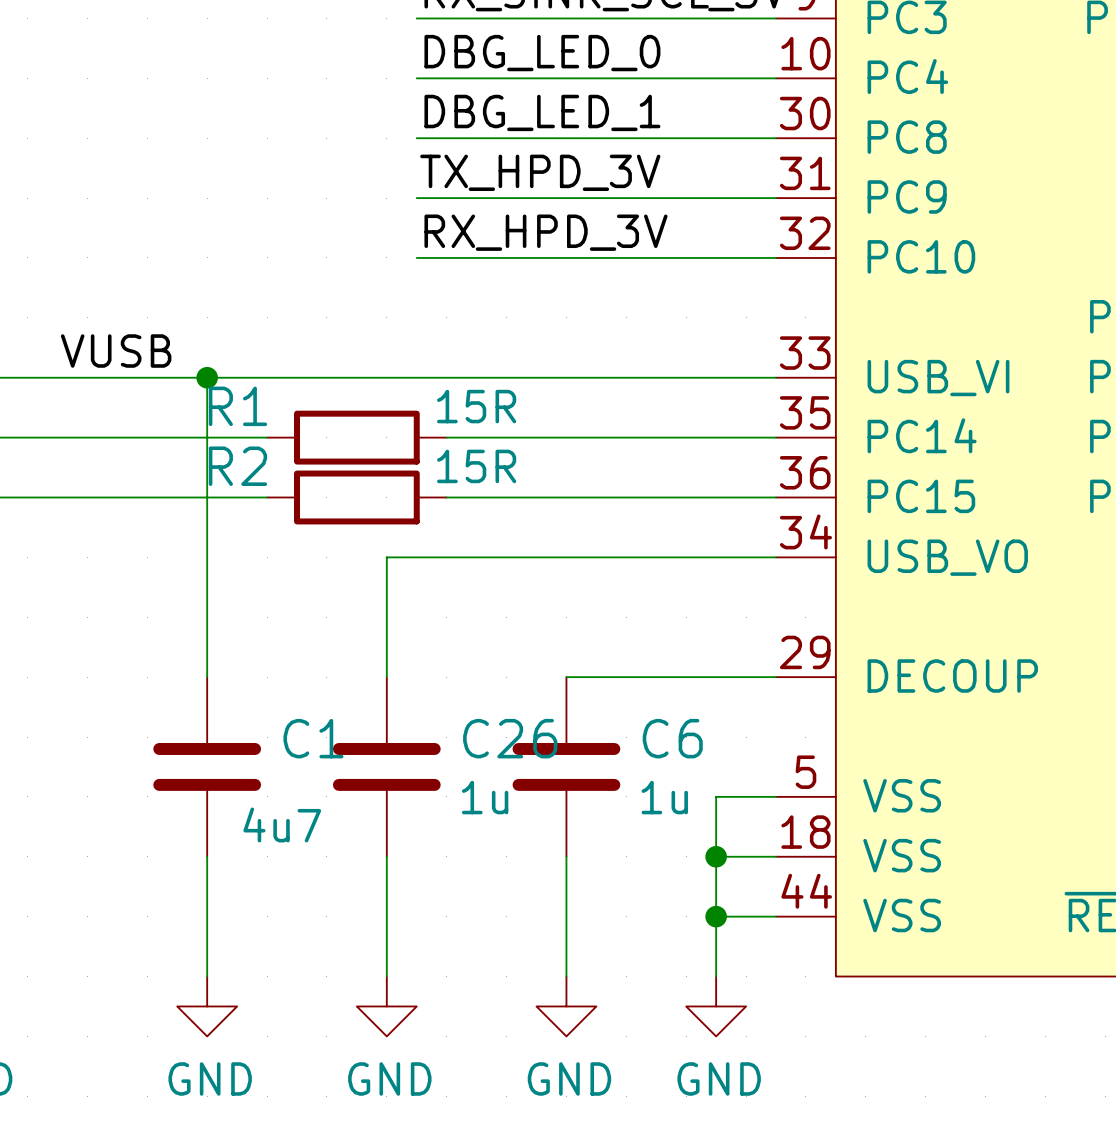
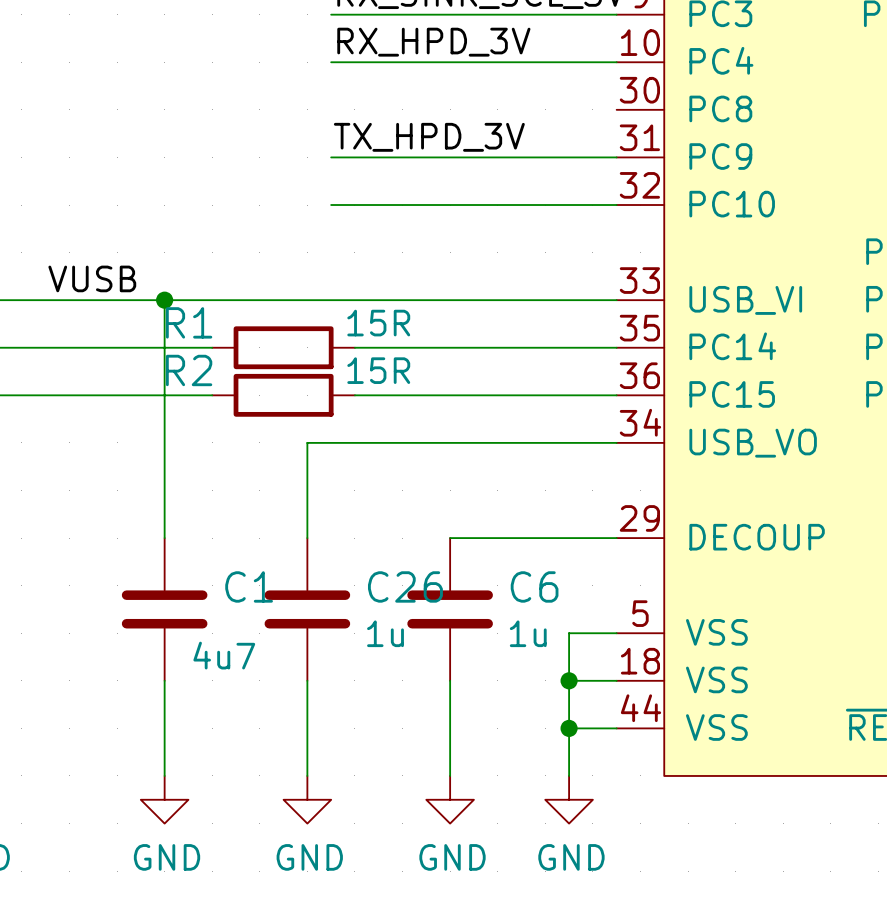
label: DBG_LED_0 (542, 53) -> RX_HPD_3V (433, 42)
label: DBG_LED_1 (542, 112) -> none
wire: (416, 138) (776, 138) -> none
label: RX_HPD_3V (546, 232) -> none

